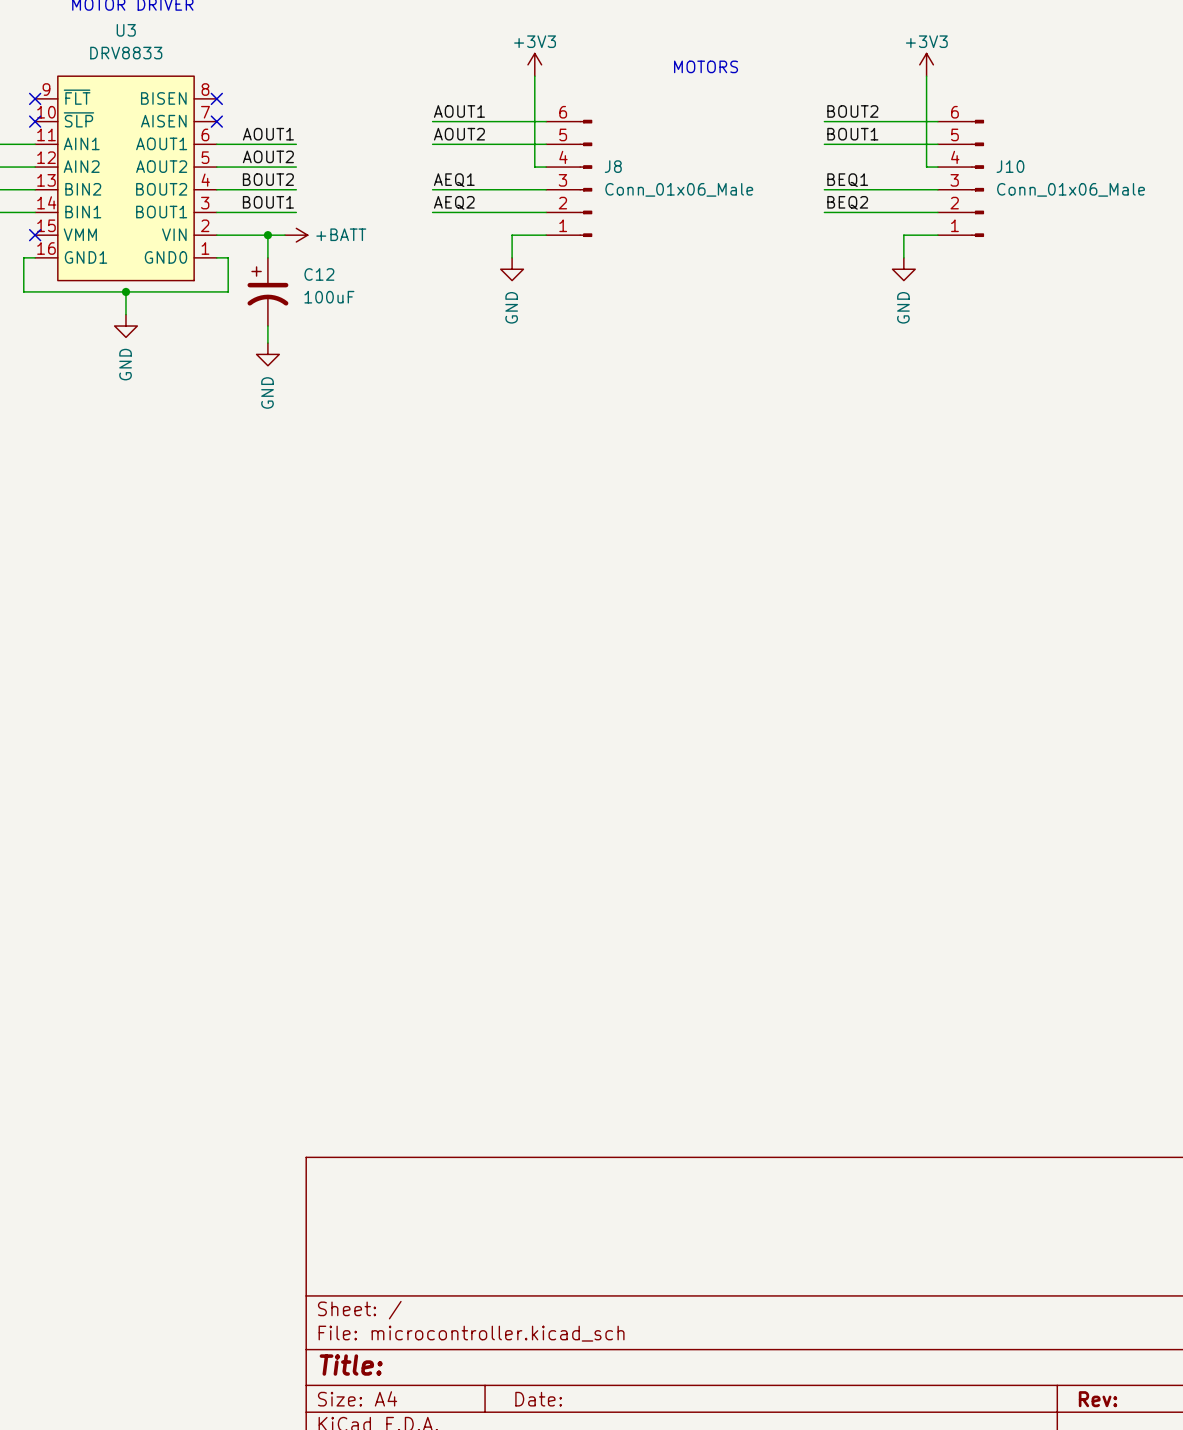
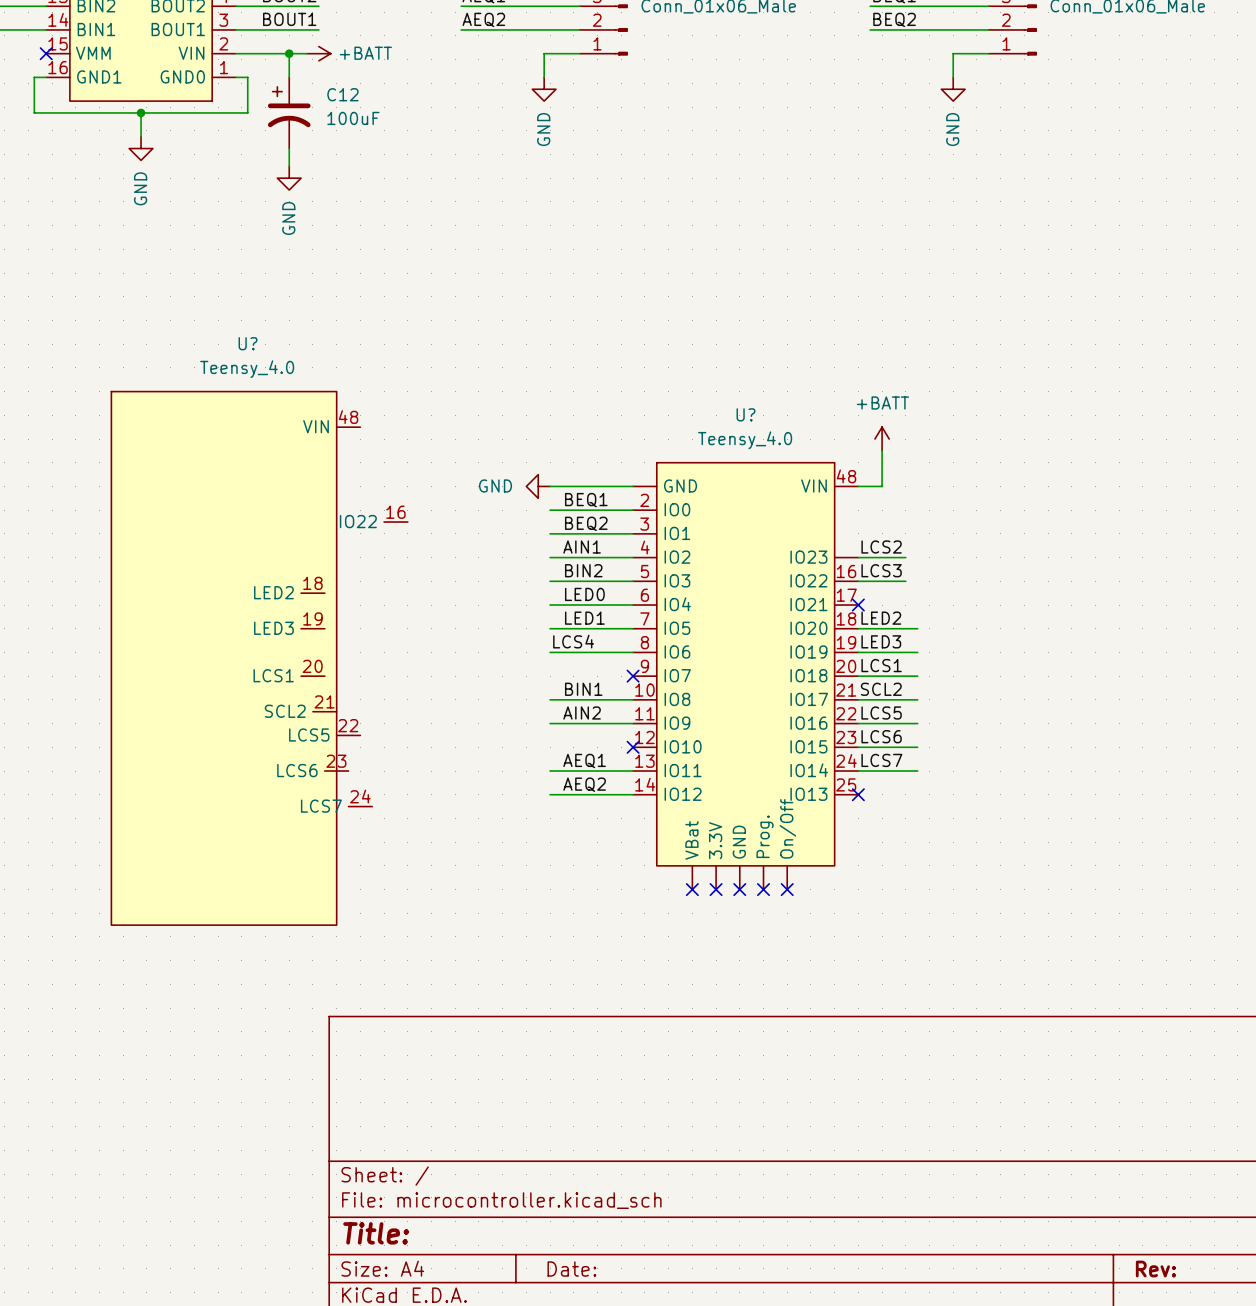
power symbol: none -> +BATT (882, 439)
wire: none -> (882, 450) (882, 486) (858, 486)
power symbol: none -> GND (538, 486)
wire: none -> (550, 486) (633, 486)
label: none -> BEQ1 (586, 500)
wire: none -> (550, 510) (633, 510)
label: none -> BEQ2 (586, 523)
wire: none -> (550, 533) (633, 533)
label: none -> AIN1 (582, 547)
label: none -> LCS2 (881, 547)
wire: none -> (550, 557) (633, 557)
wire: none -> (858, 557) (905, 557)
label: none -> BIN2 (583, 570)
label: none -> LCS3 (881, 570)
wire: none -> (550, 581) (633, 581)
wire: none -> (858, 581) (905, 581)
label: none -> LED0 (584, 594)
wire: none -> (550, 605) (633, 605)
no-connect mark: none -> (858, 605)
label: none -> LED1 (584, 618)
label: none -> LED2 (881, 618)
wire: none -> (550, 628) (633, 628)
wire: none -> (858, 628) (917, 628)
label: none -> LCS4 (573, 641)
label: none -> LED3 (881, 641)
wire: none -> (550, 652) (633, 652)
wire: none -> (858, 652) (917, 652)
U?: none -> Teensy_4.0 (259, 658)
label: none -> LCS1 (881, 665)
no-connect mark: none -> (633, 676)
U?: none -> Teensy_4.0 (745, 676)
wire: none -> (858, 676) (917, 676)
label: none -> BIN1 (583, 689)
label: none -> SCL2 (881, 689)
wire: none -> (550, 699) (633, 699)
wire: none -> (858, 699) (917, 699)
label: none -> AIN2 (582, 712)
label: none -> LCS5 (881, 712)
wire: none -> (550, 723) (633, 723)
wire: none -> (858, 723) (917, 723)
label: none -> LCS6 (881, 736)
no-connect mark: none -> (633, 747)
wire: none -> (858, 747) (917, 747)
label: none -> AEQ1 (584, 760)
label: none -> LCS7 (881, 760)
wire: none -> (550, 771) (633, 771)
wire: none -> (858, 771) (917, 771)
label: none -> AEQ2 (584, 784)
wire: none -> (550, 794) (633, 794)
no-connect mark: none -> (858, 794)
no-connect mark: none -> (692, 889)
no-connect mark: none -> (716, 889)
no-connect mark: none -> (739, 889)
no-connect mark: none -> (763, 889)
no-connect mark: none -> (787, 889)

